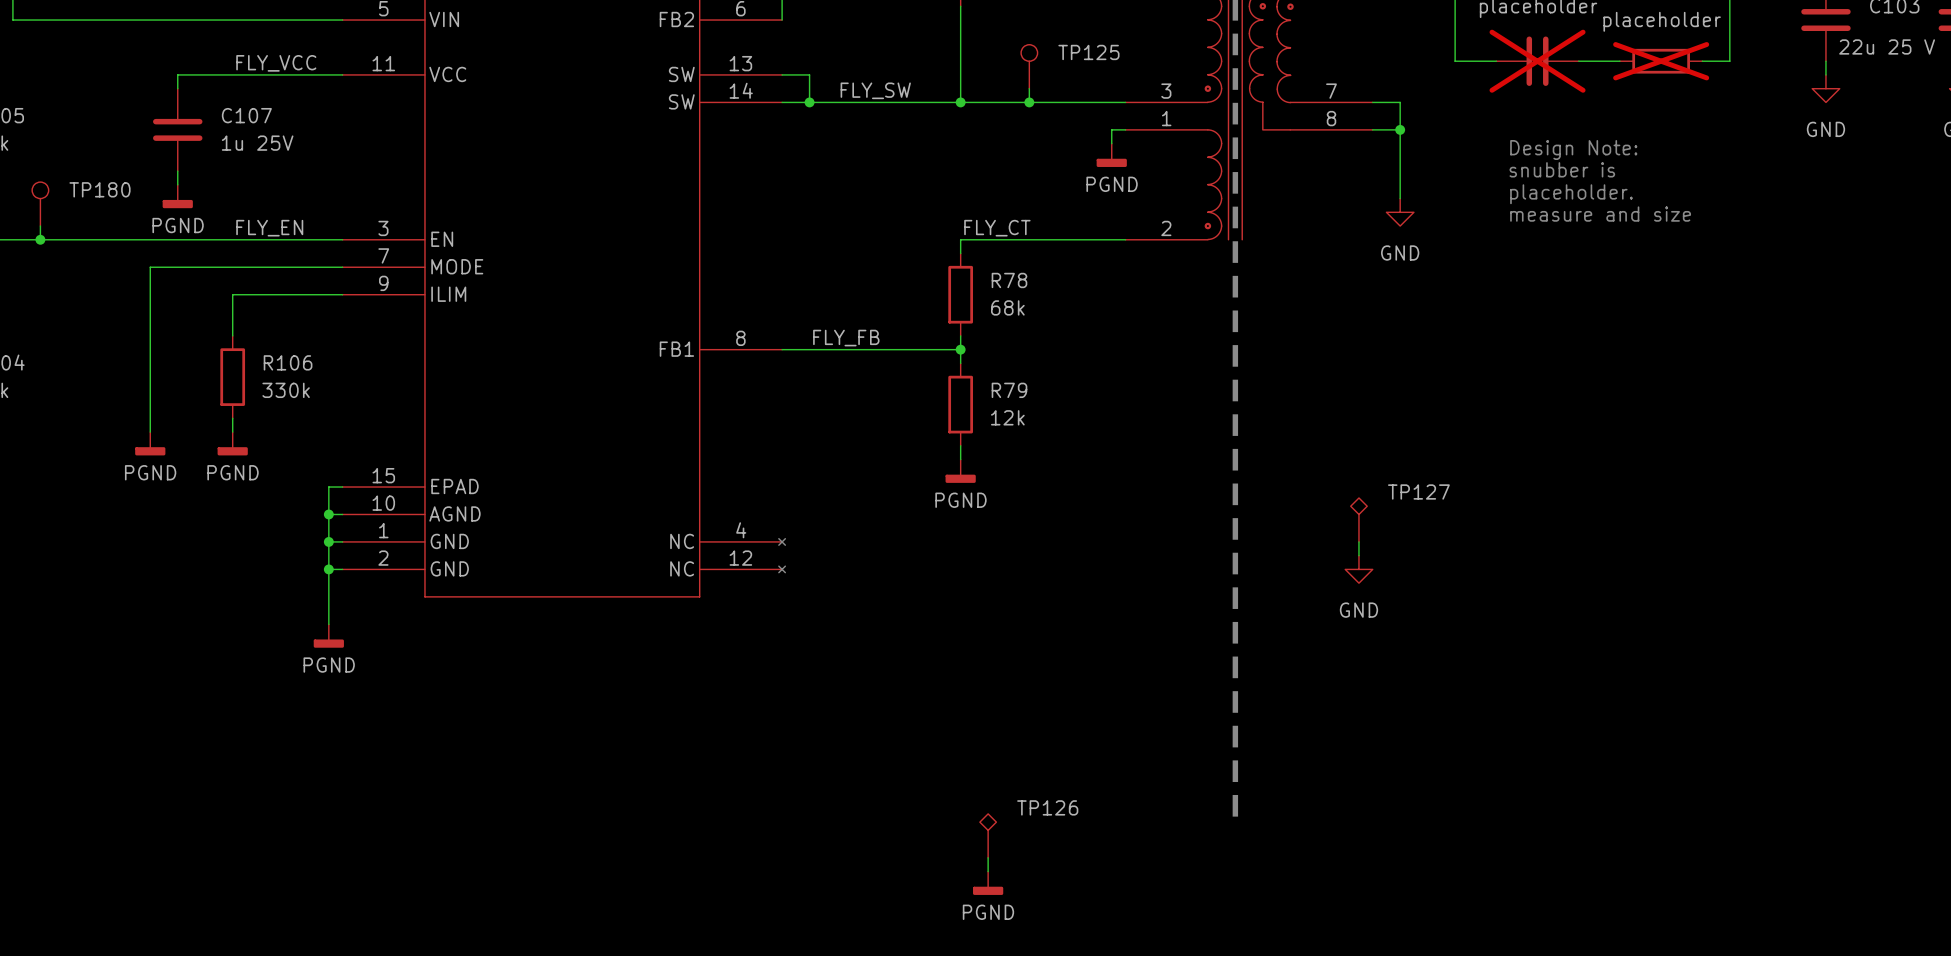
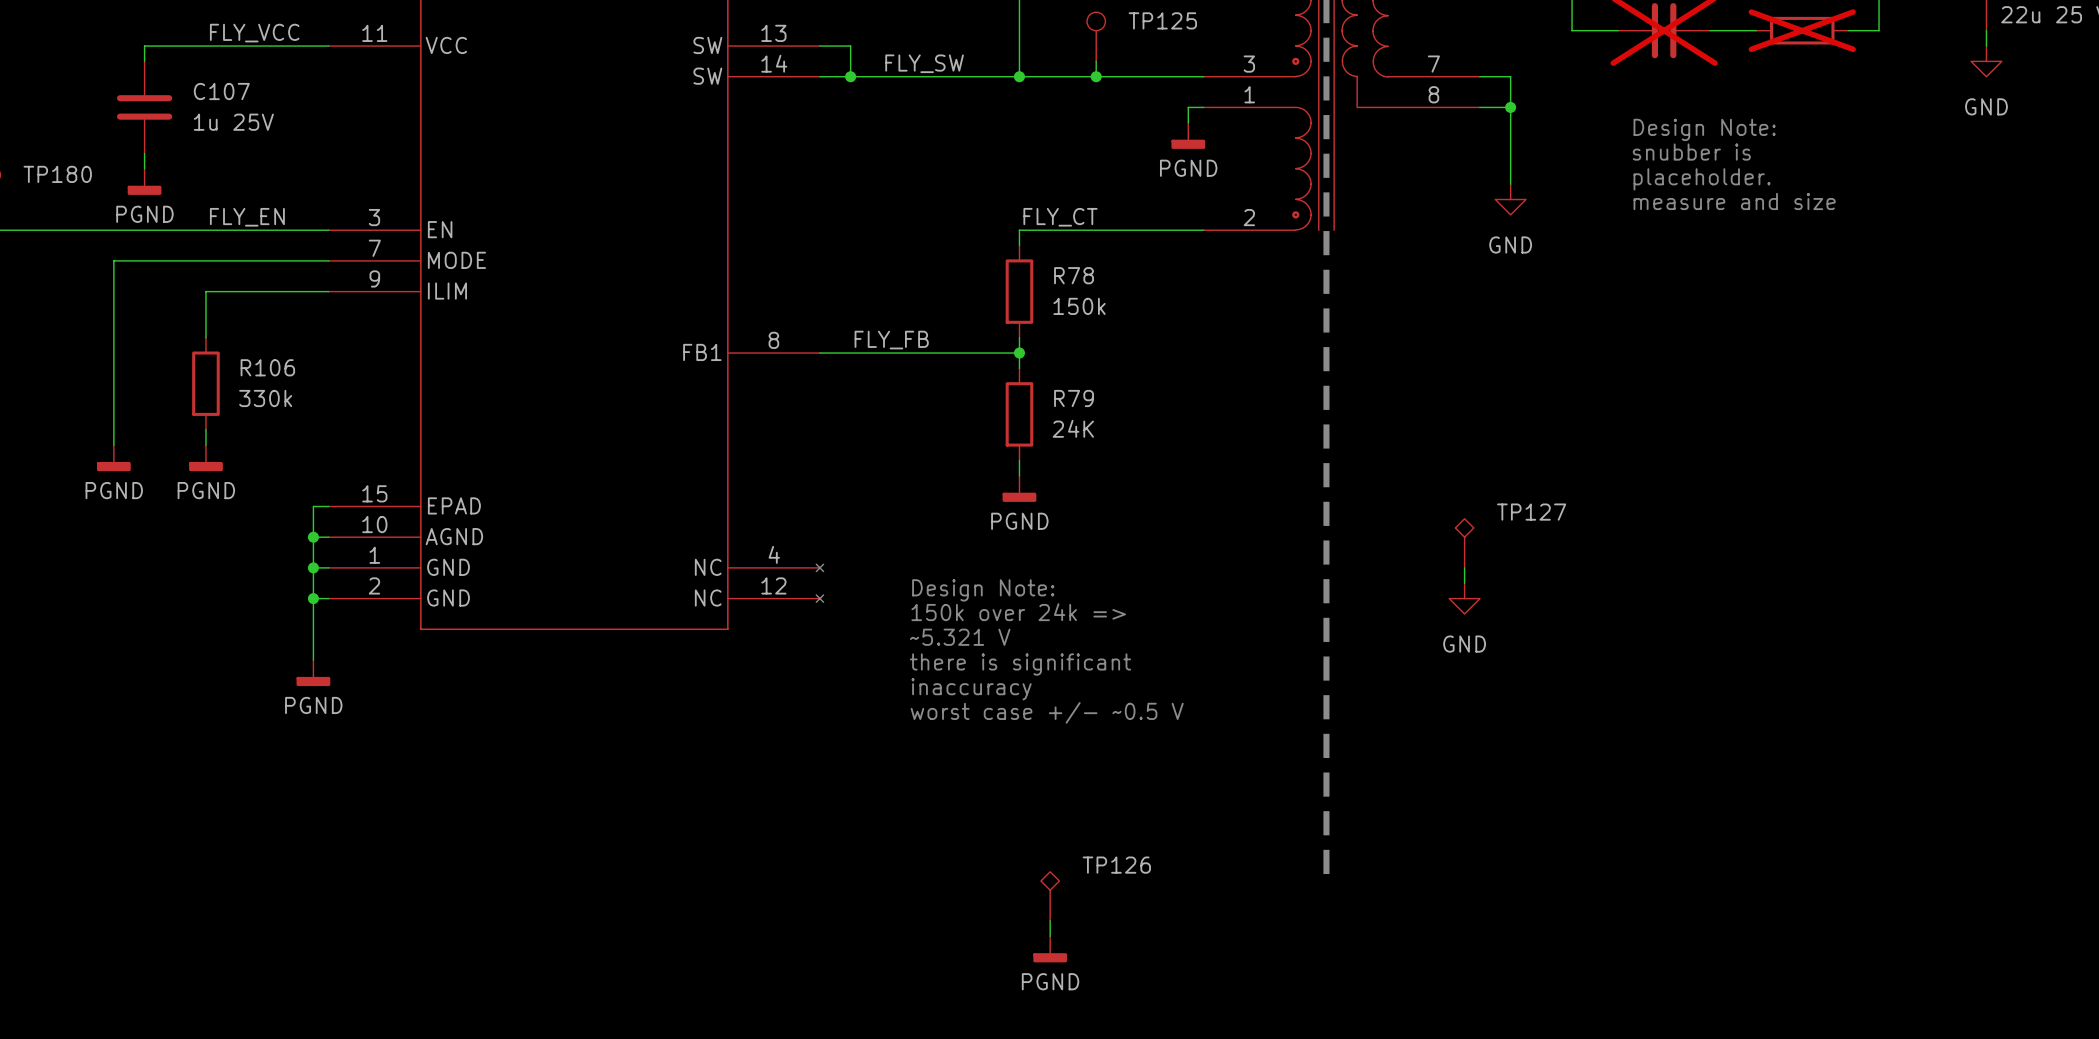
R78 value: 68k (1007, 307) -> 150k (1079, 306)
R79 value: 12k (1007, 417) -> 24K (1073, 428)
text: none -> Design Note: (983, 590)
text: none -> 150k over 24k => (1018, 612)
text: none -> ~5.321 V (960, 637)
text: none -> there is significant (1020, 664)
text: none -> inaccuracy (971, 689)
text: none -> worst case +/- ~0.5 V (1047, 712)

